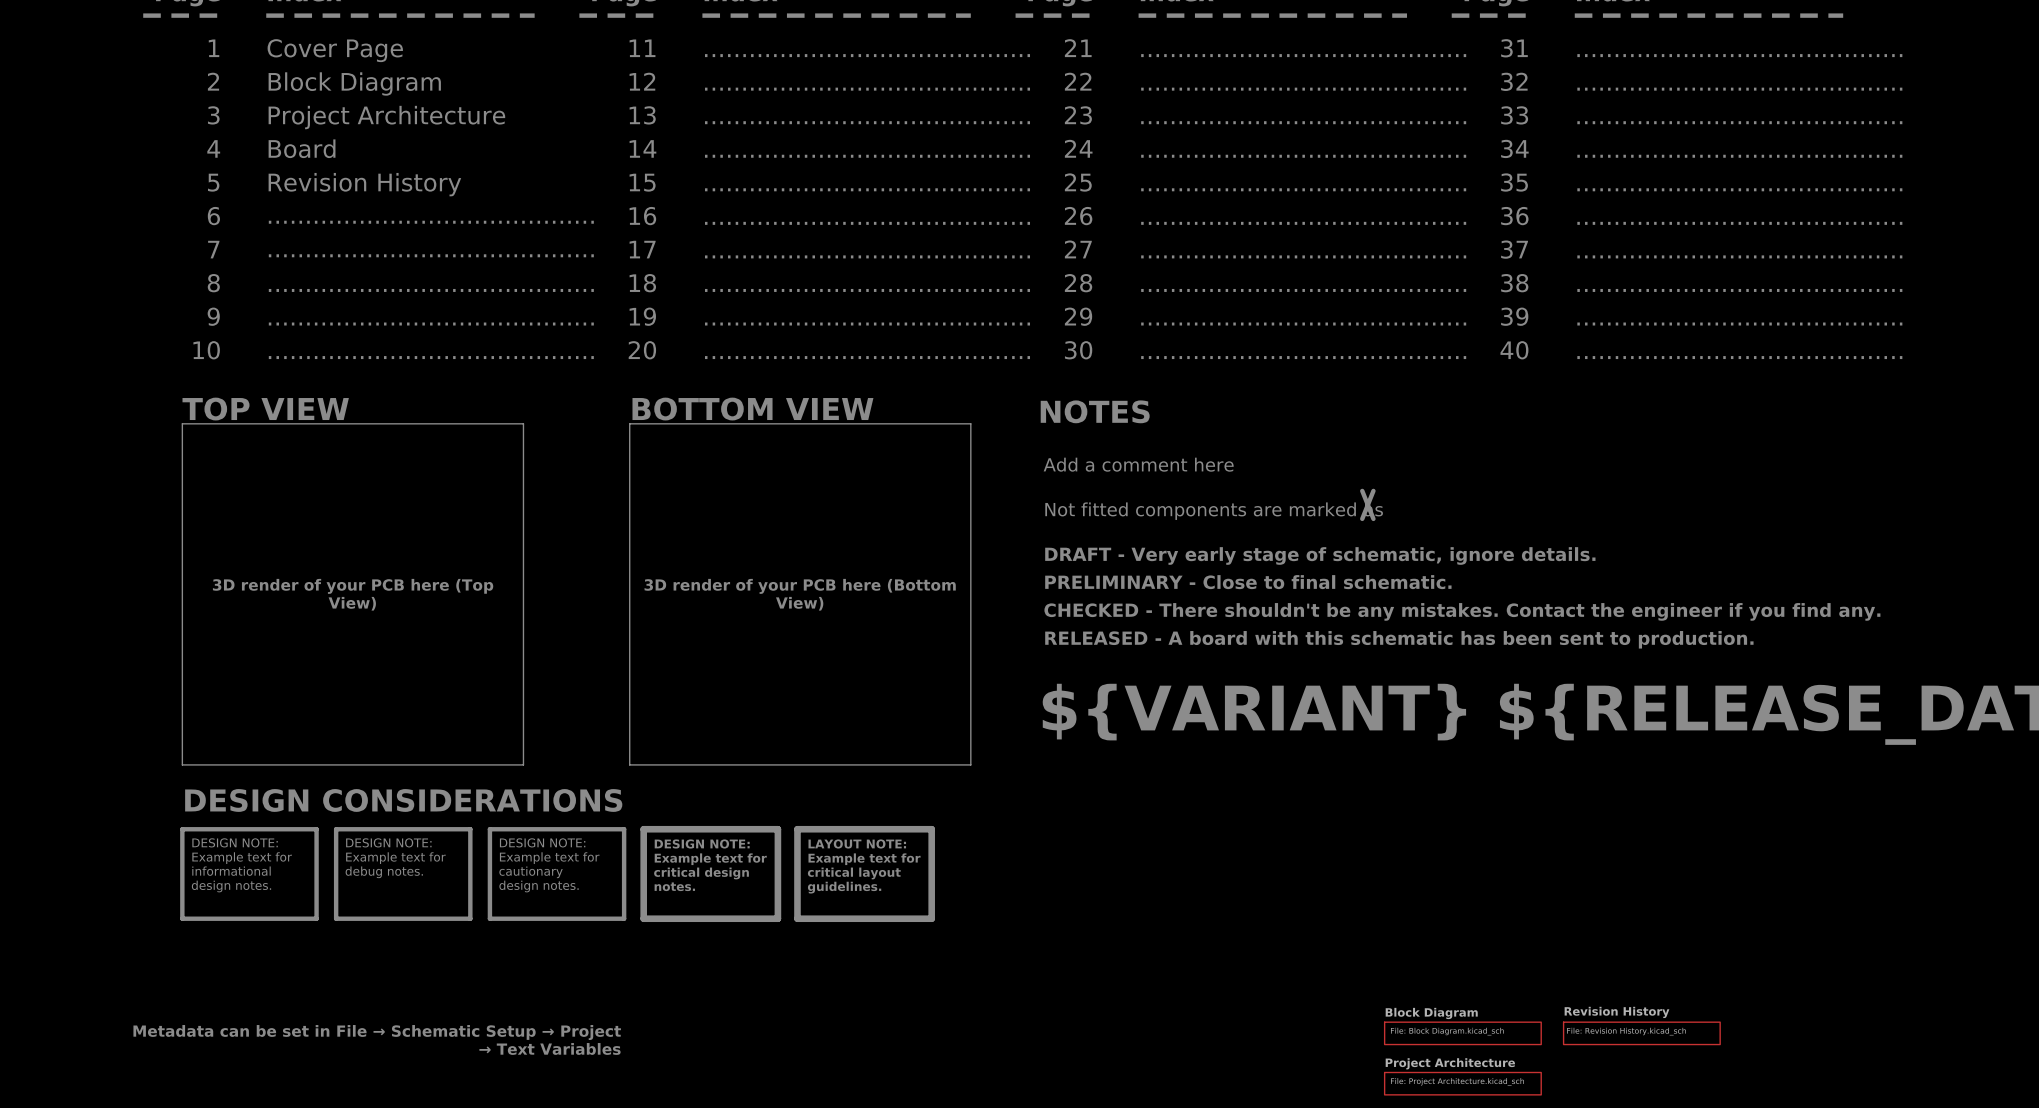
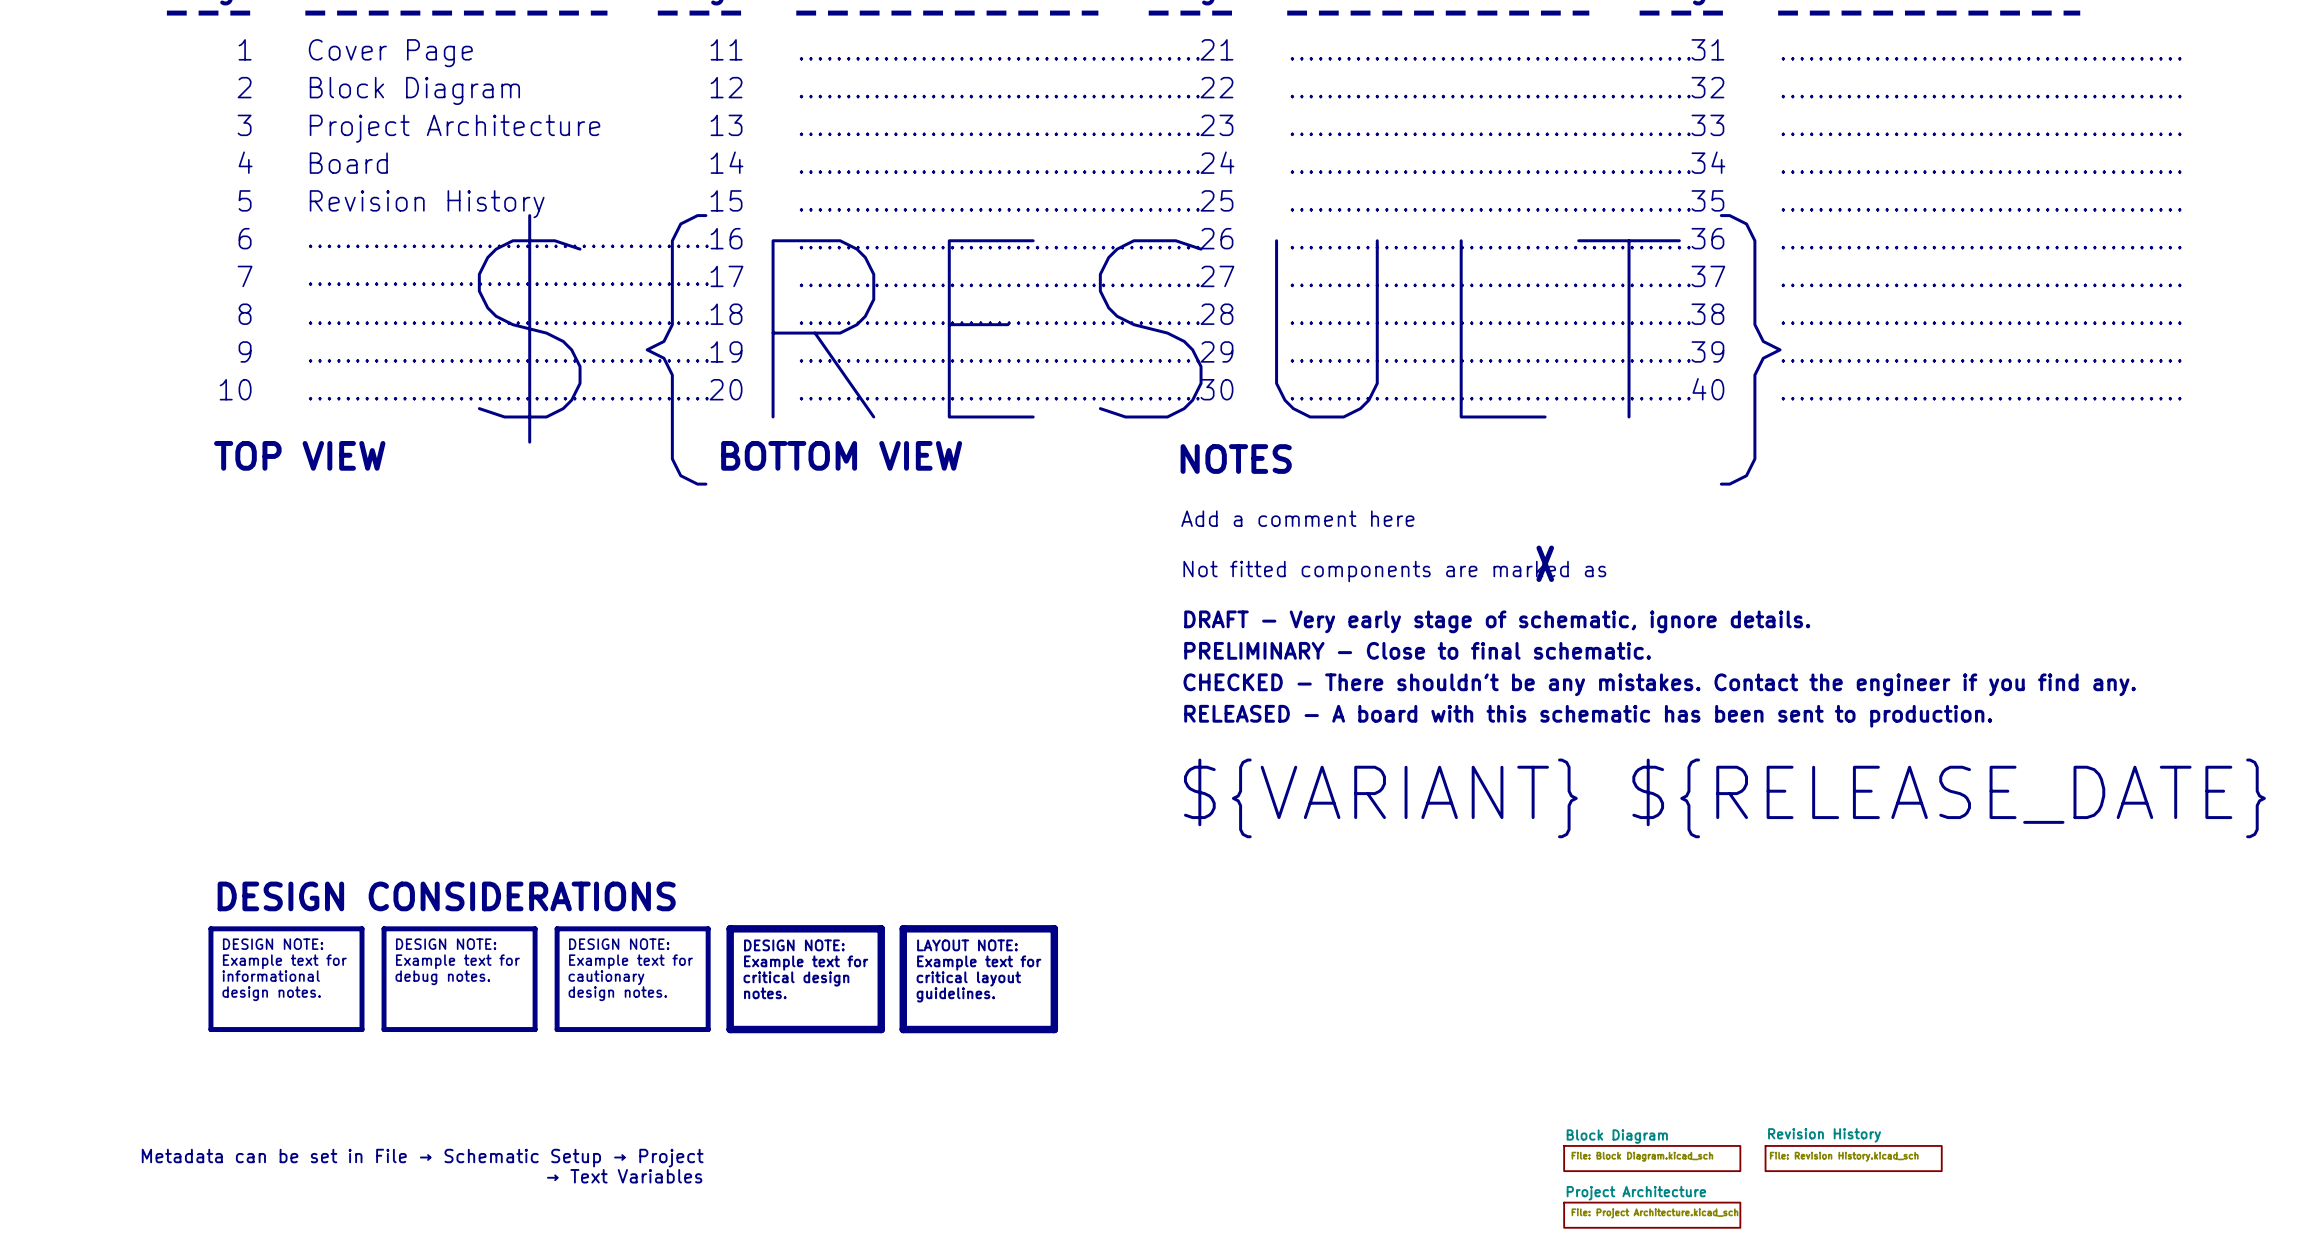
text: none -> ${RESULT} (1129, 349)
line: (182, 423) (523, 423) (523, 764) (182, 764) (182, 423) -> none
line: (629, 423) (970, 423) (970, 764) (629, 764) (629, 423) -> none
text: 3D render of your PCB here (Top (353, 586) -> none
text: 3D render of your PCB here (Bottom (800, 586) -> none
text: View) (352, 603) -> none
text: View) (799, 603) -> none

